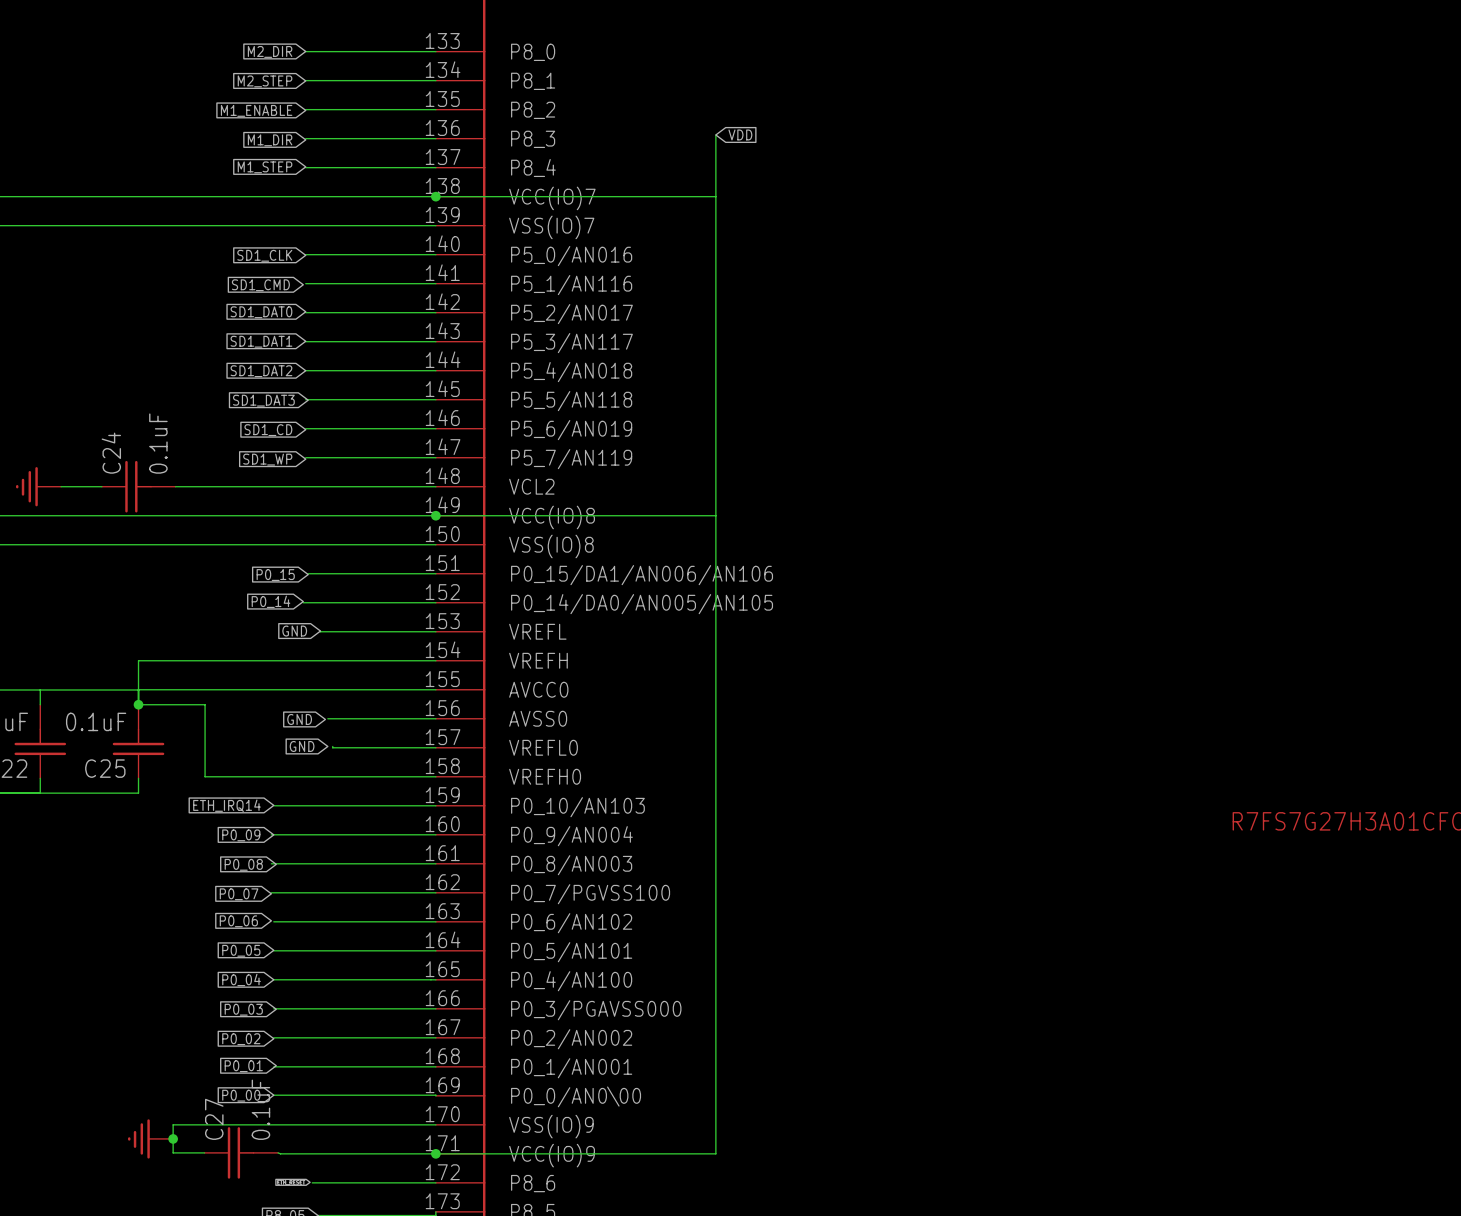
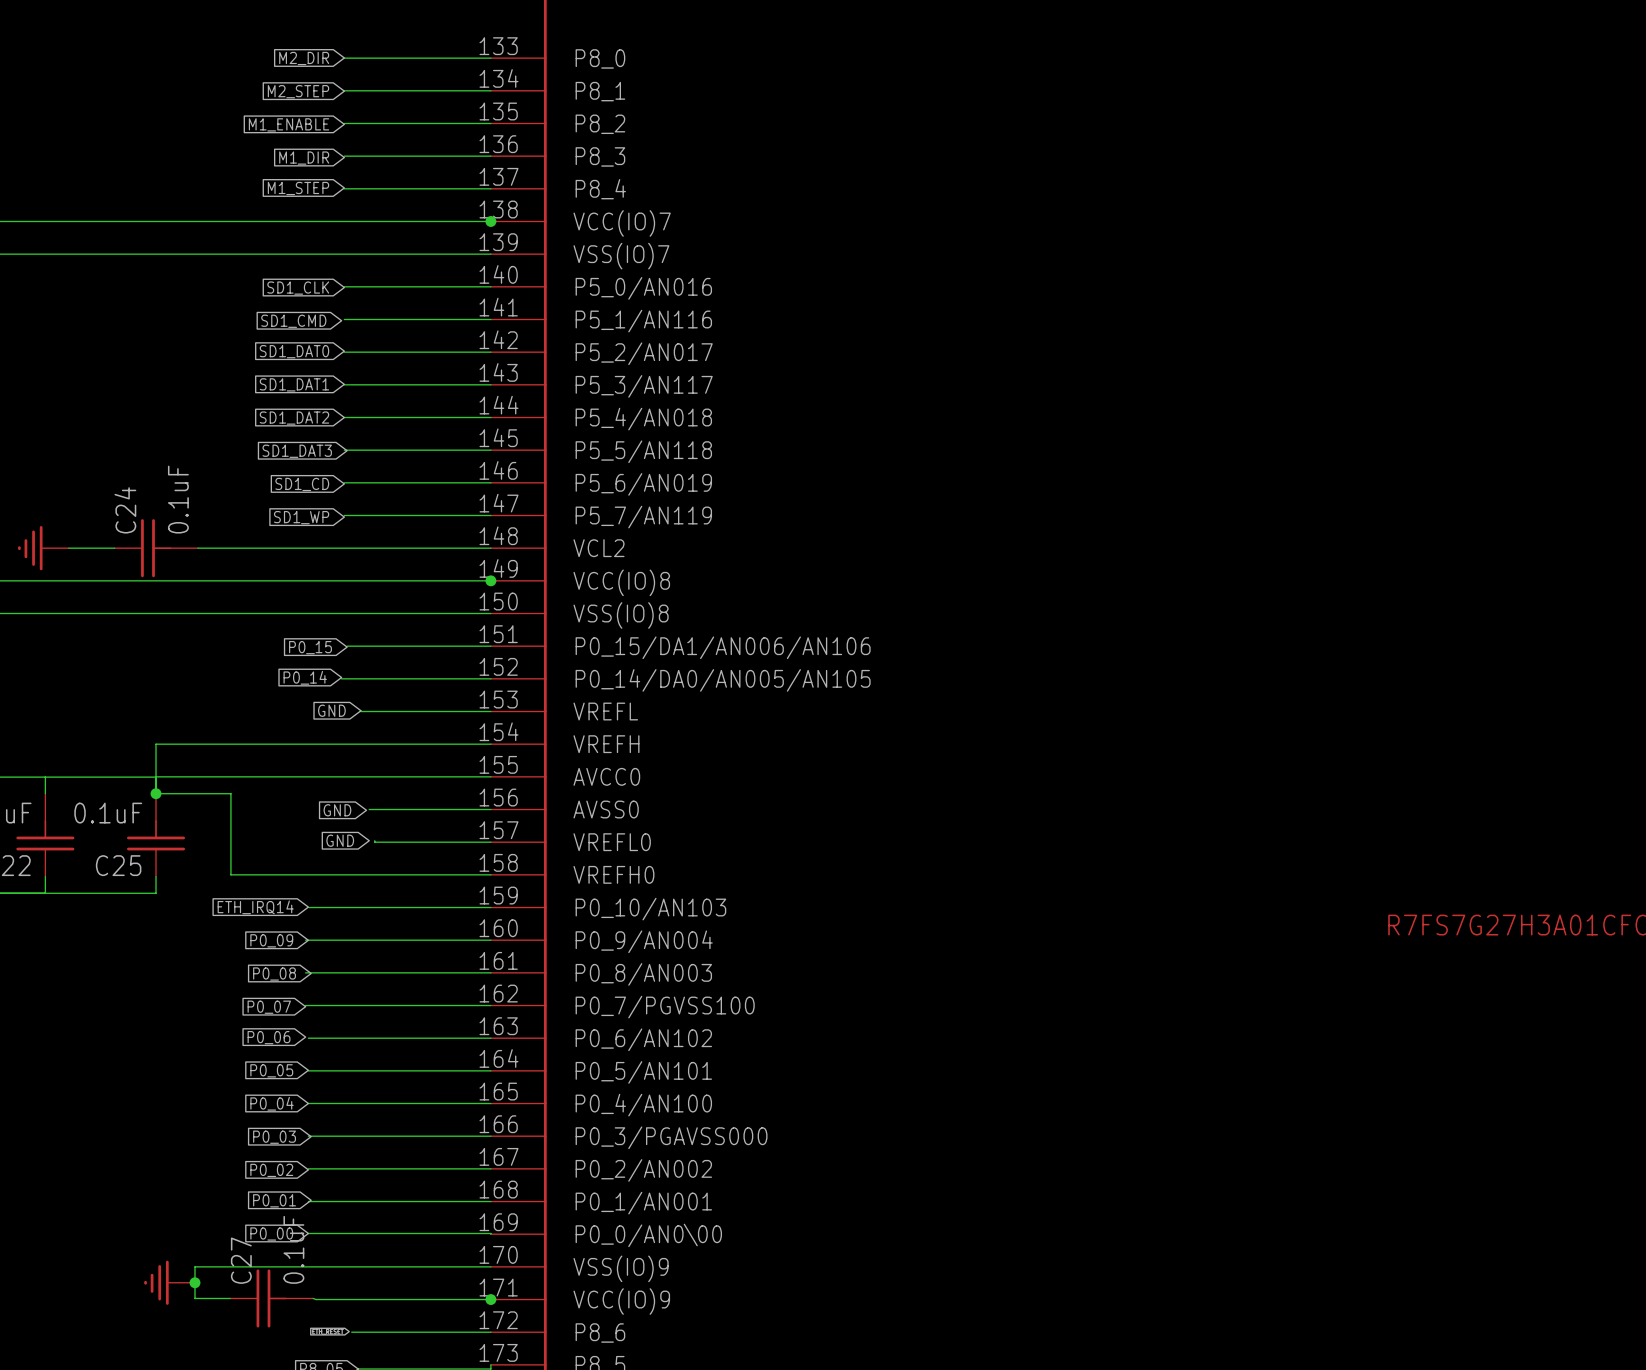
wire: (715, 134) (715, 1153) (435, 1153) -> none
global label: VDD (740, 134) -> none
wire: (435, 196) (715, 196) -> none
wire: (435, 515) (715, 515) -> none

